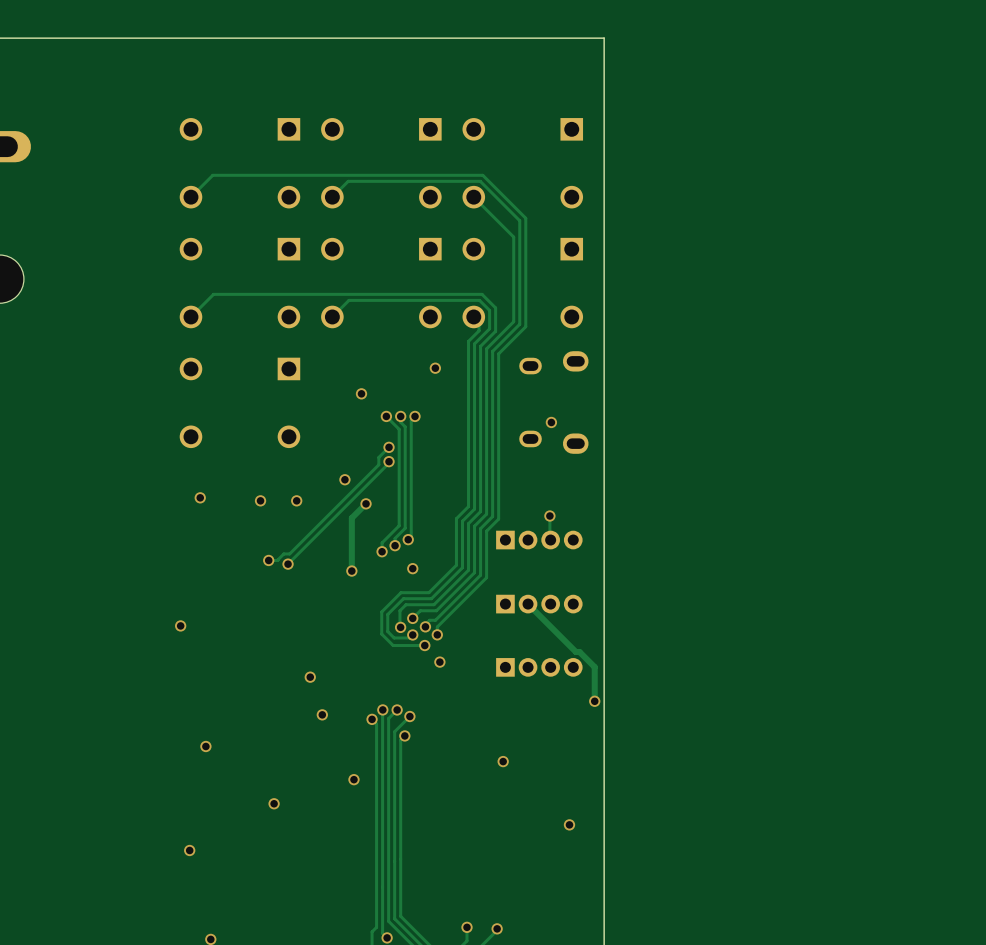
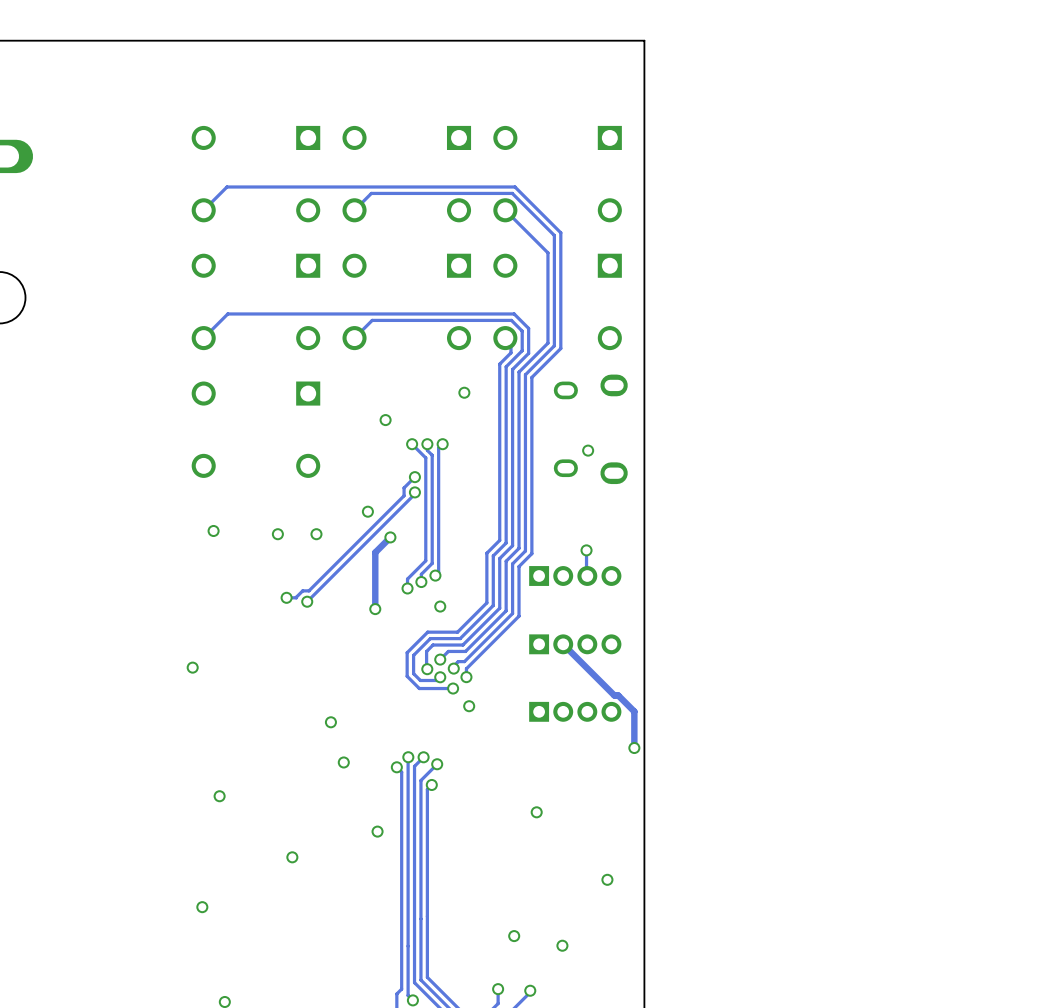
via: none -> (514, 936)
via: none -> (562, 945)

